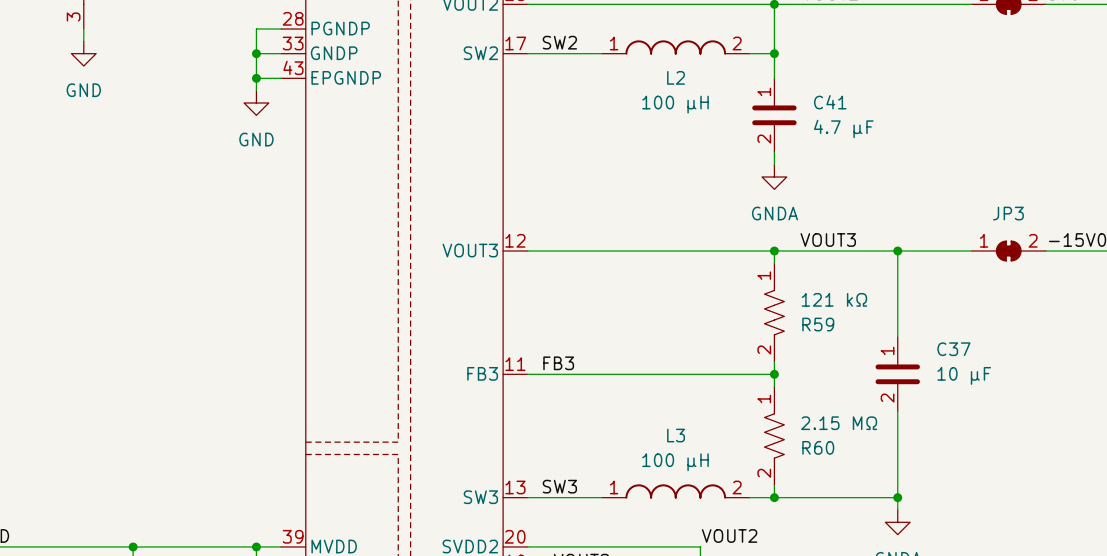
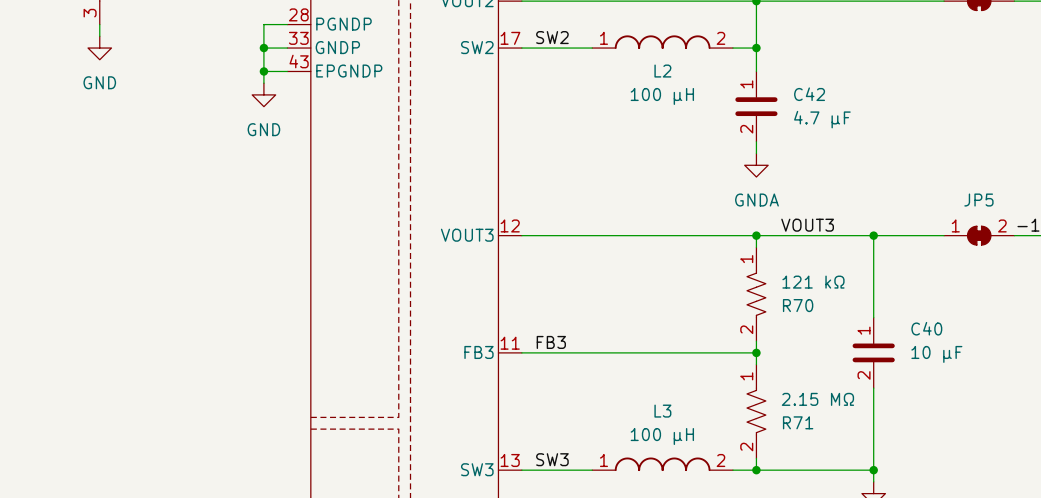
C41 name: C41 (830, 102) -> C42 (809, 94)
JP3 name: JP3 (1008, 213) -> JP5 (978, 200)
R59 name: R59 (818, 324) -> R70 (798, 305)
C37 name: C37 (953, 349) -> C40 (926, 328)
R60 name: R60 (818, 447) -> R71 (798, 422)

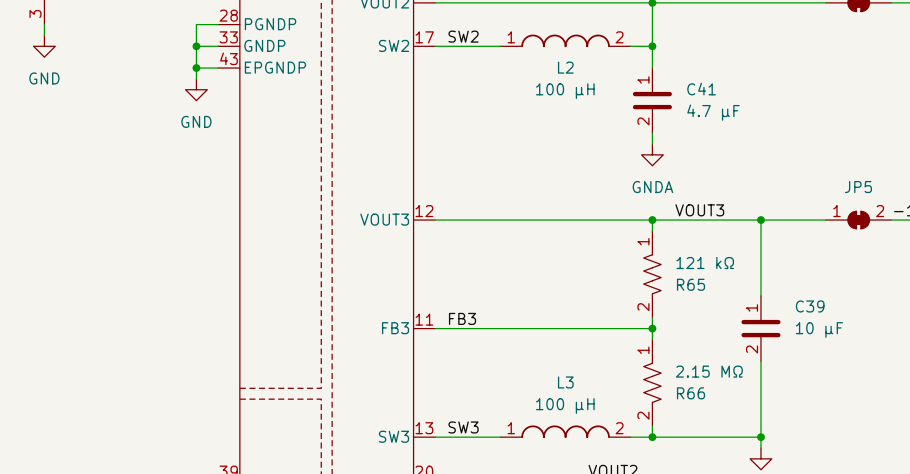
C42 name: C42 (809, 94) -> C41 (701, 89)
R70 name: R70 (798, 305) -> R65 (691, 284)
C40 name: C40 (926, 328) -> C39 (810, 306)
R71 name: R71 (798, 422) -> R66 (691, 393)

